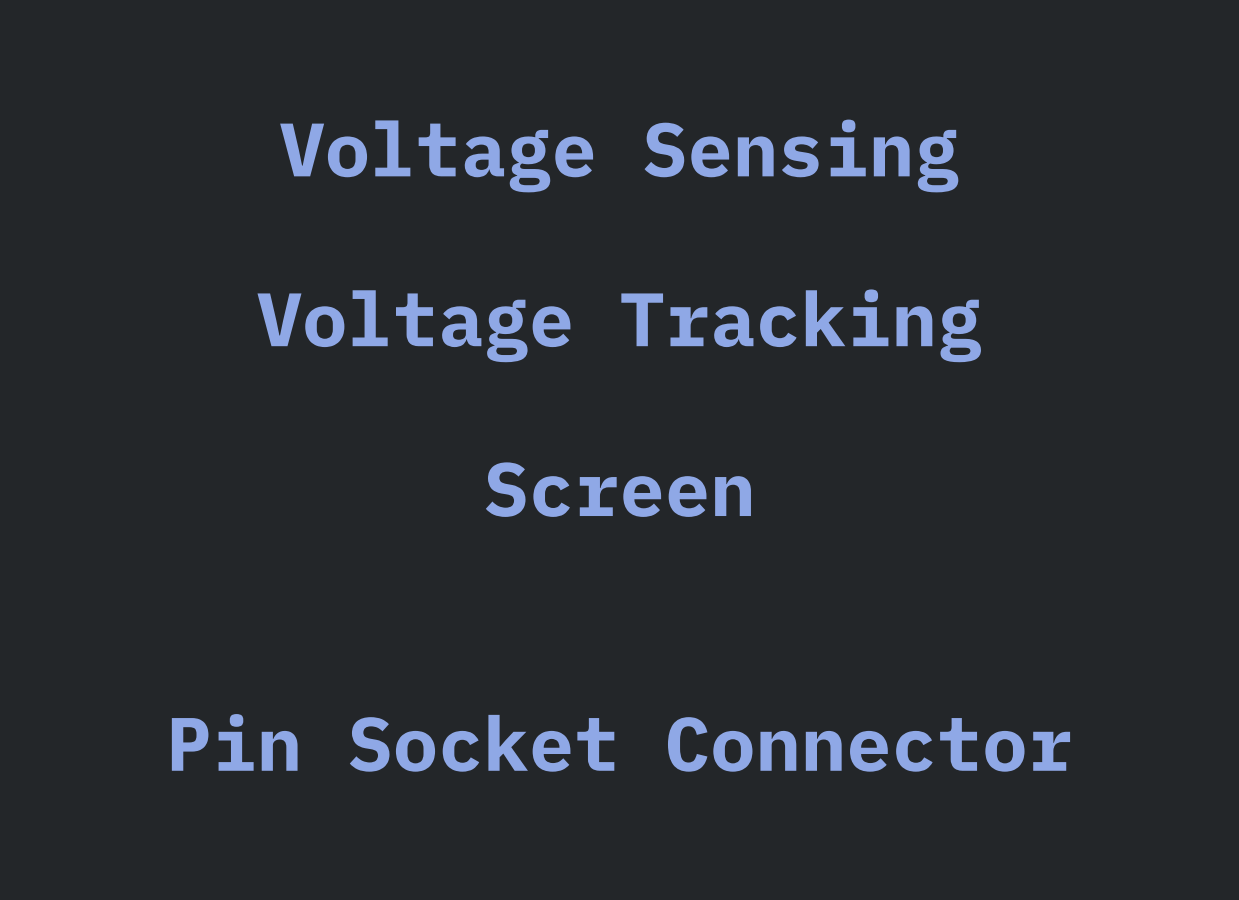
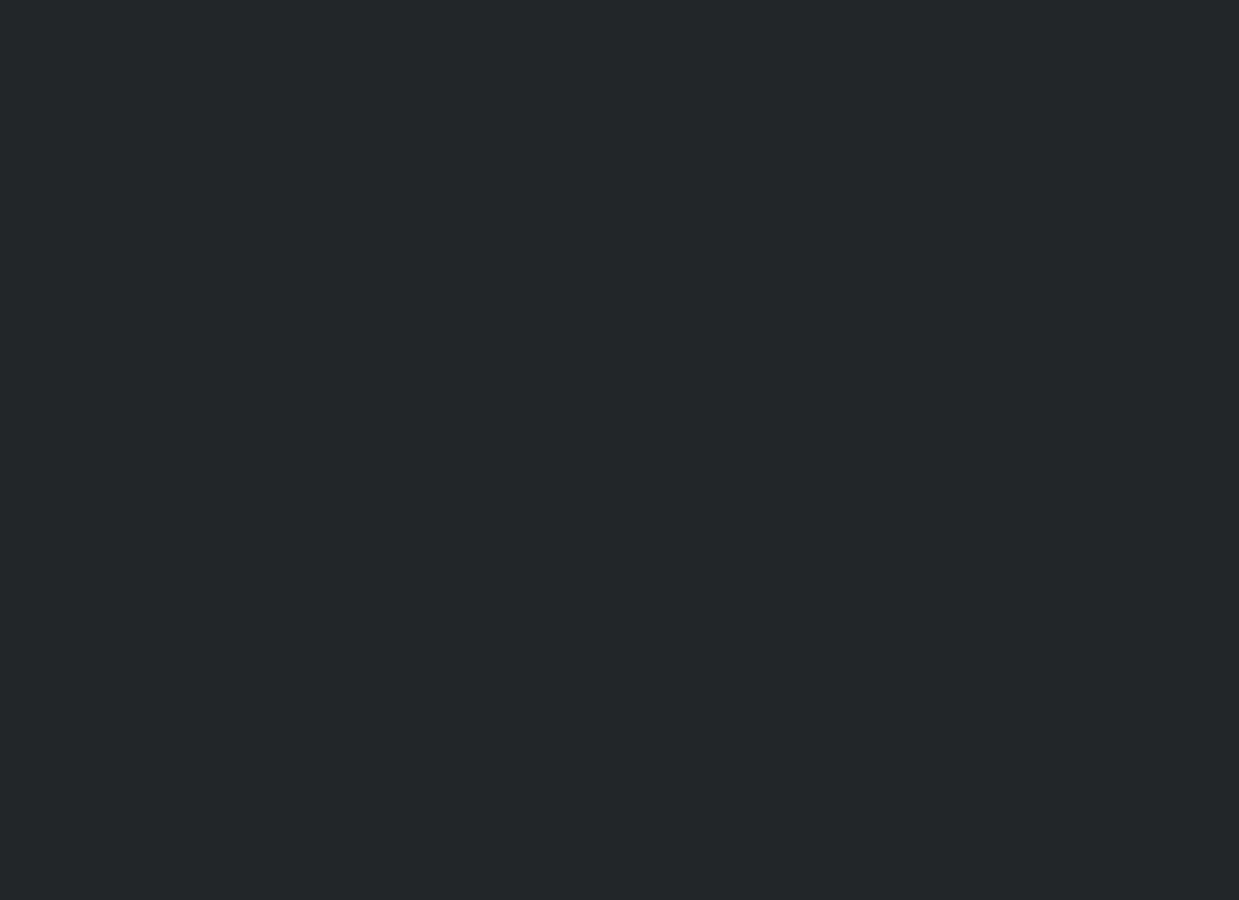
text: Voltage Sensing (619, 155) -> none
text: Voltage Tracking (619, 325) -> none
text: Screen (618, 489) -> none
text: Pin Socket Connector (620, 742) -> none

